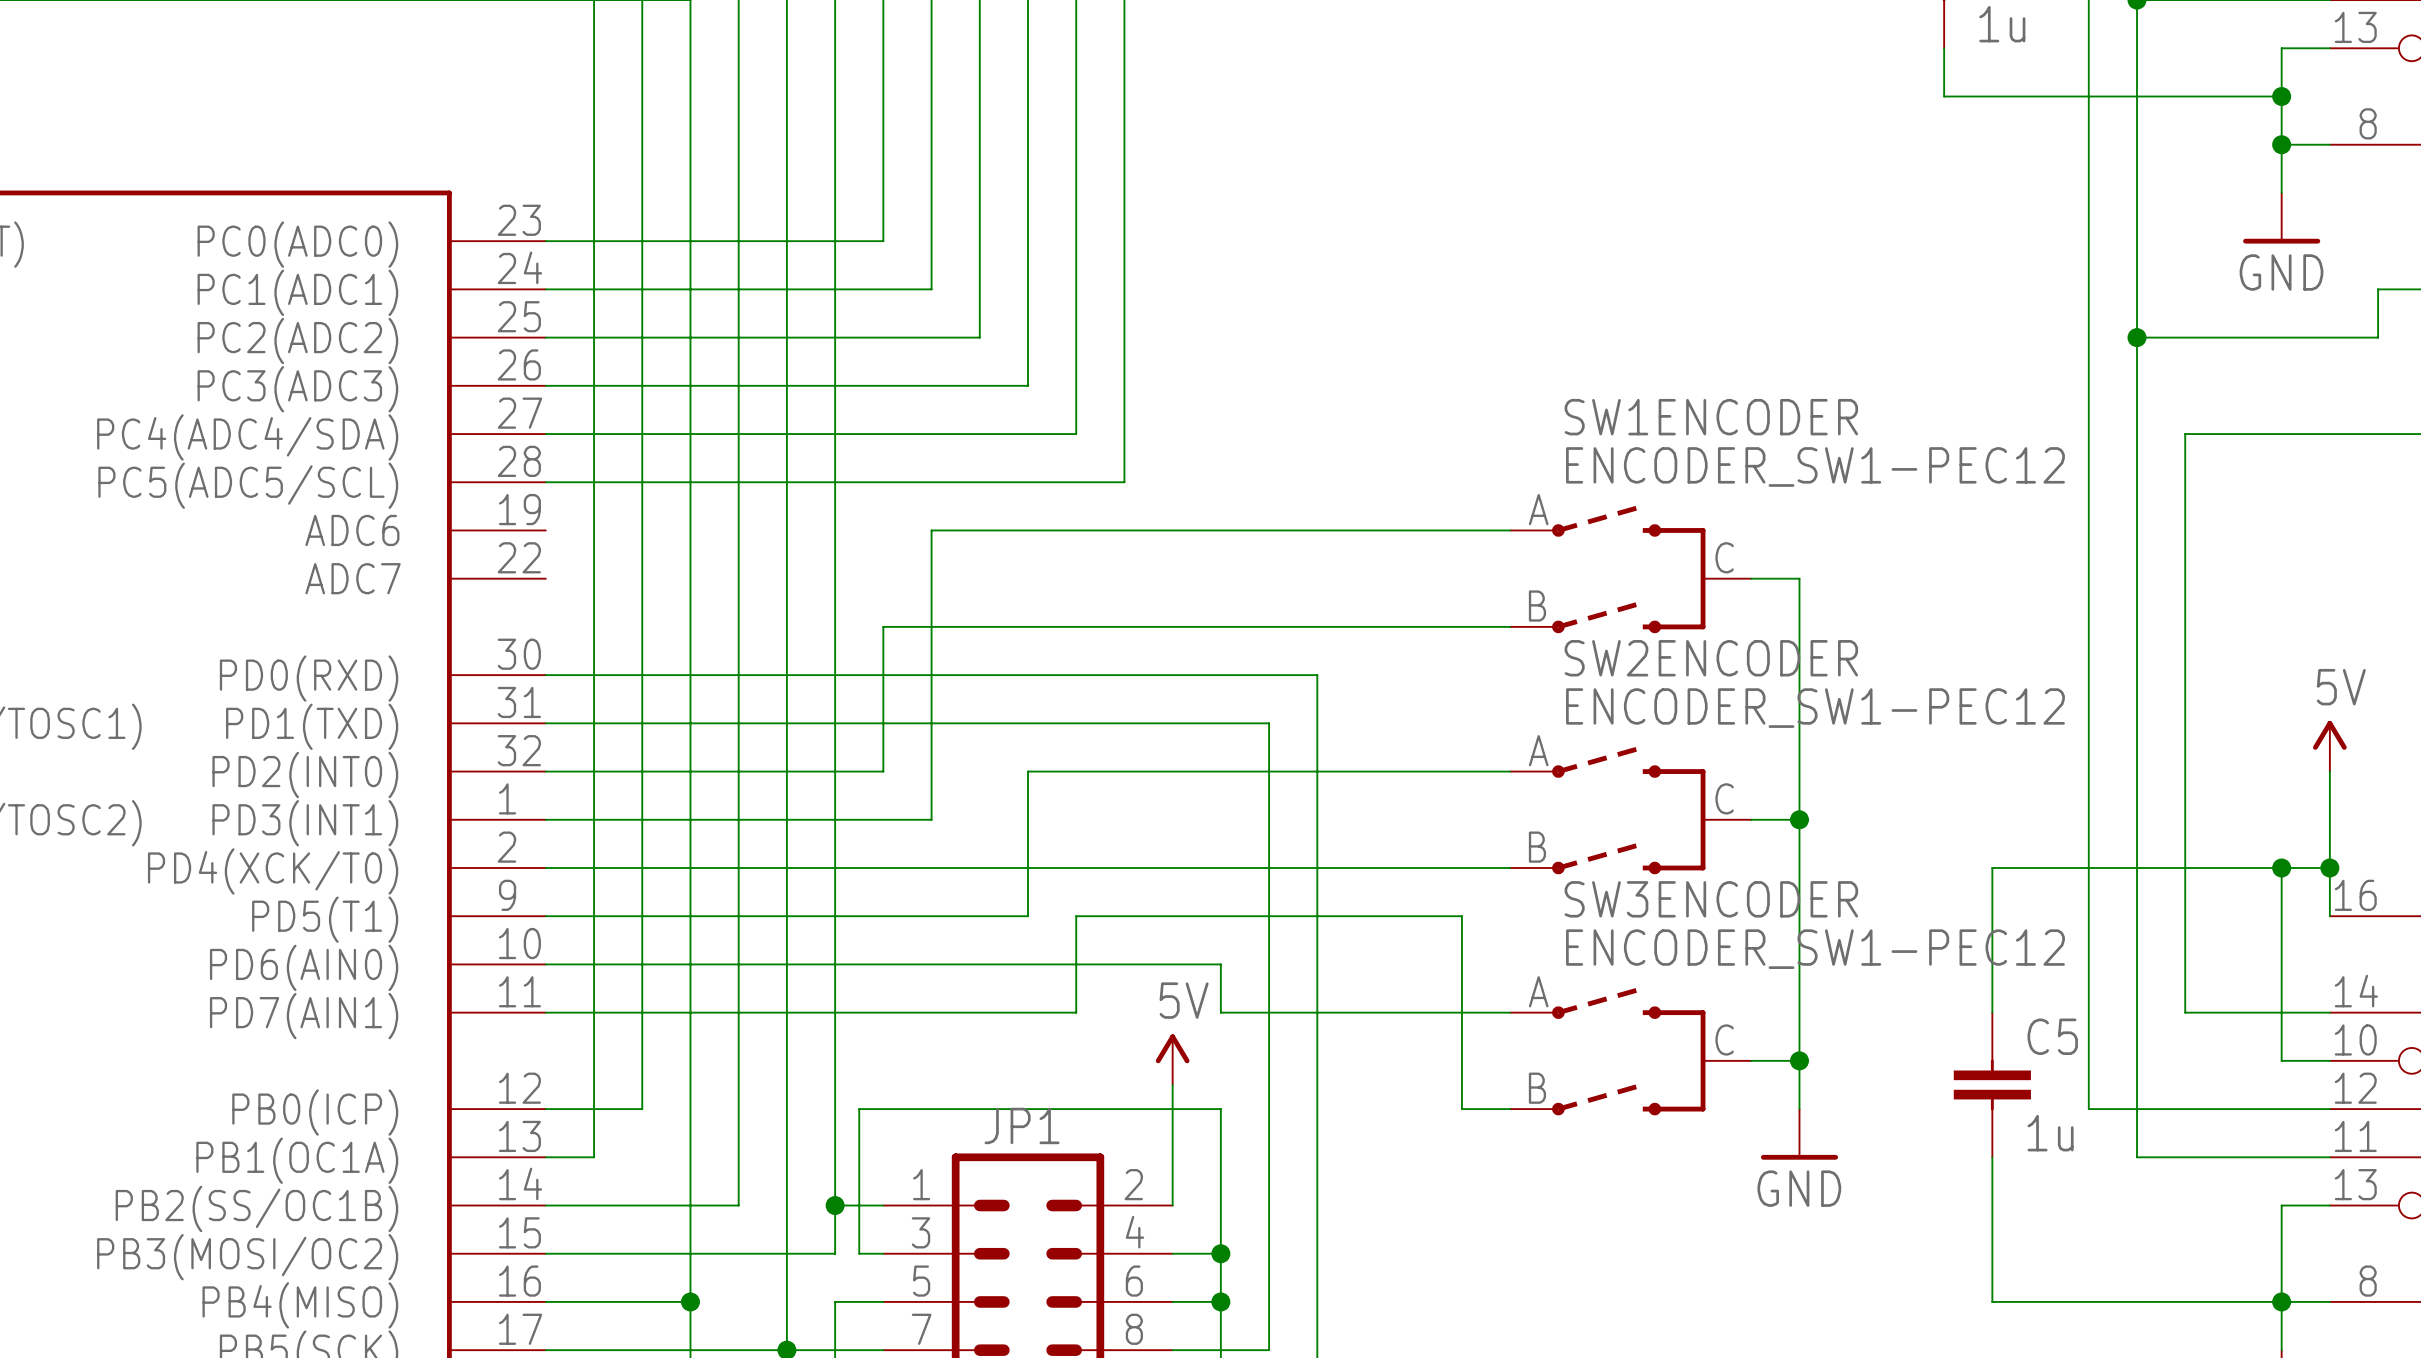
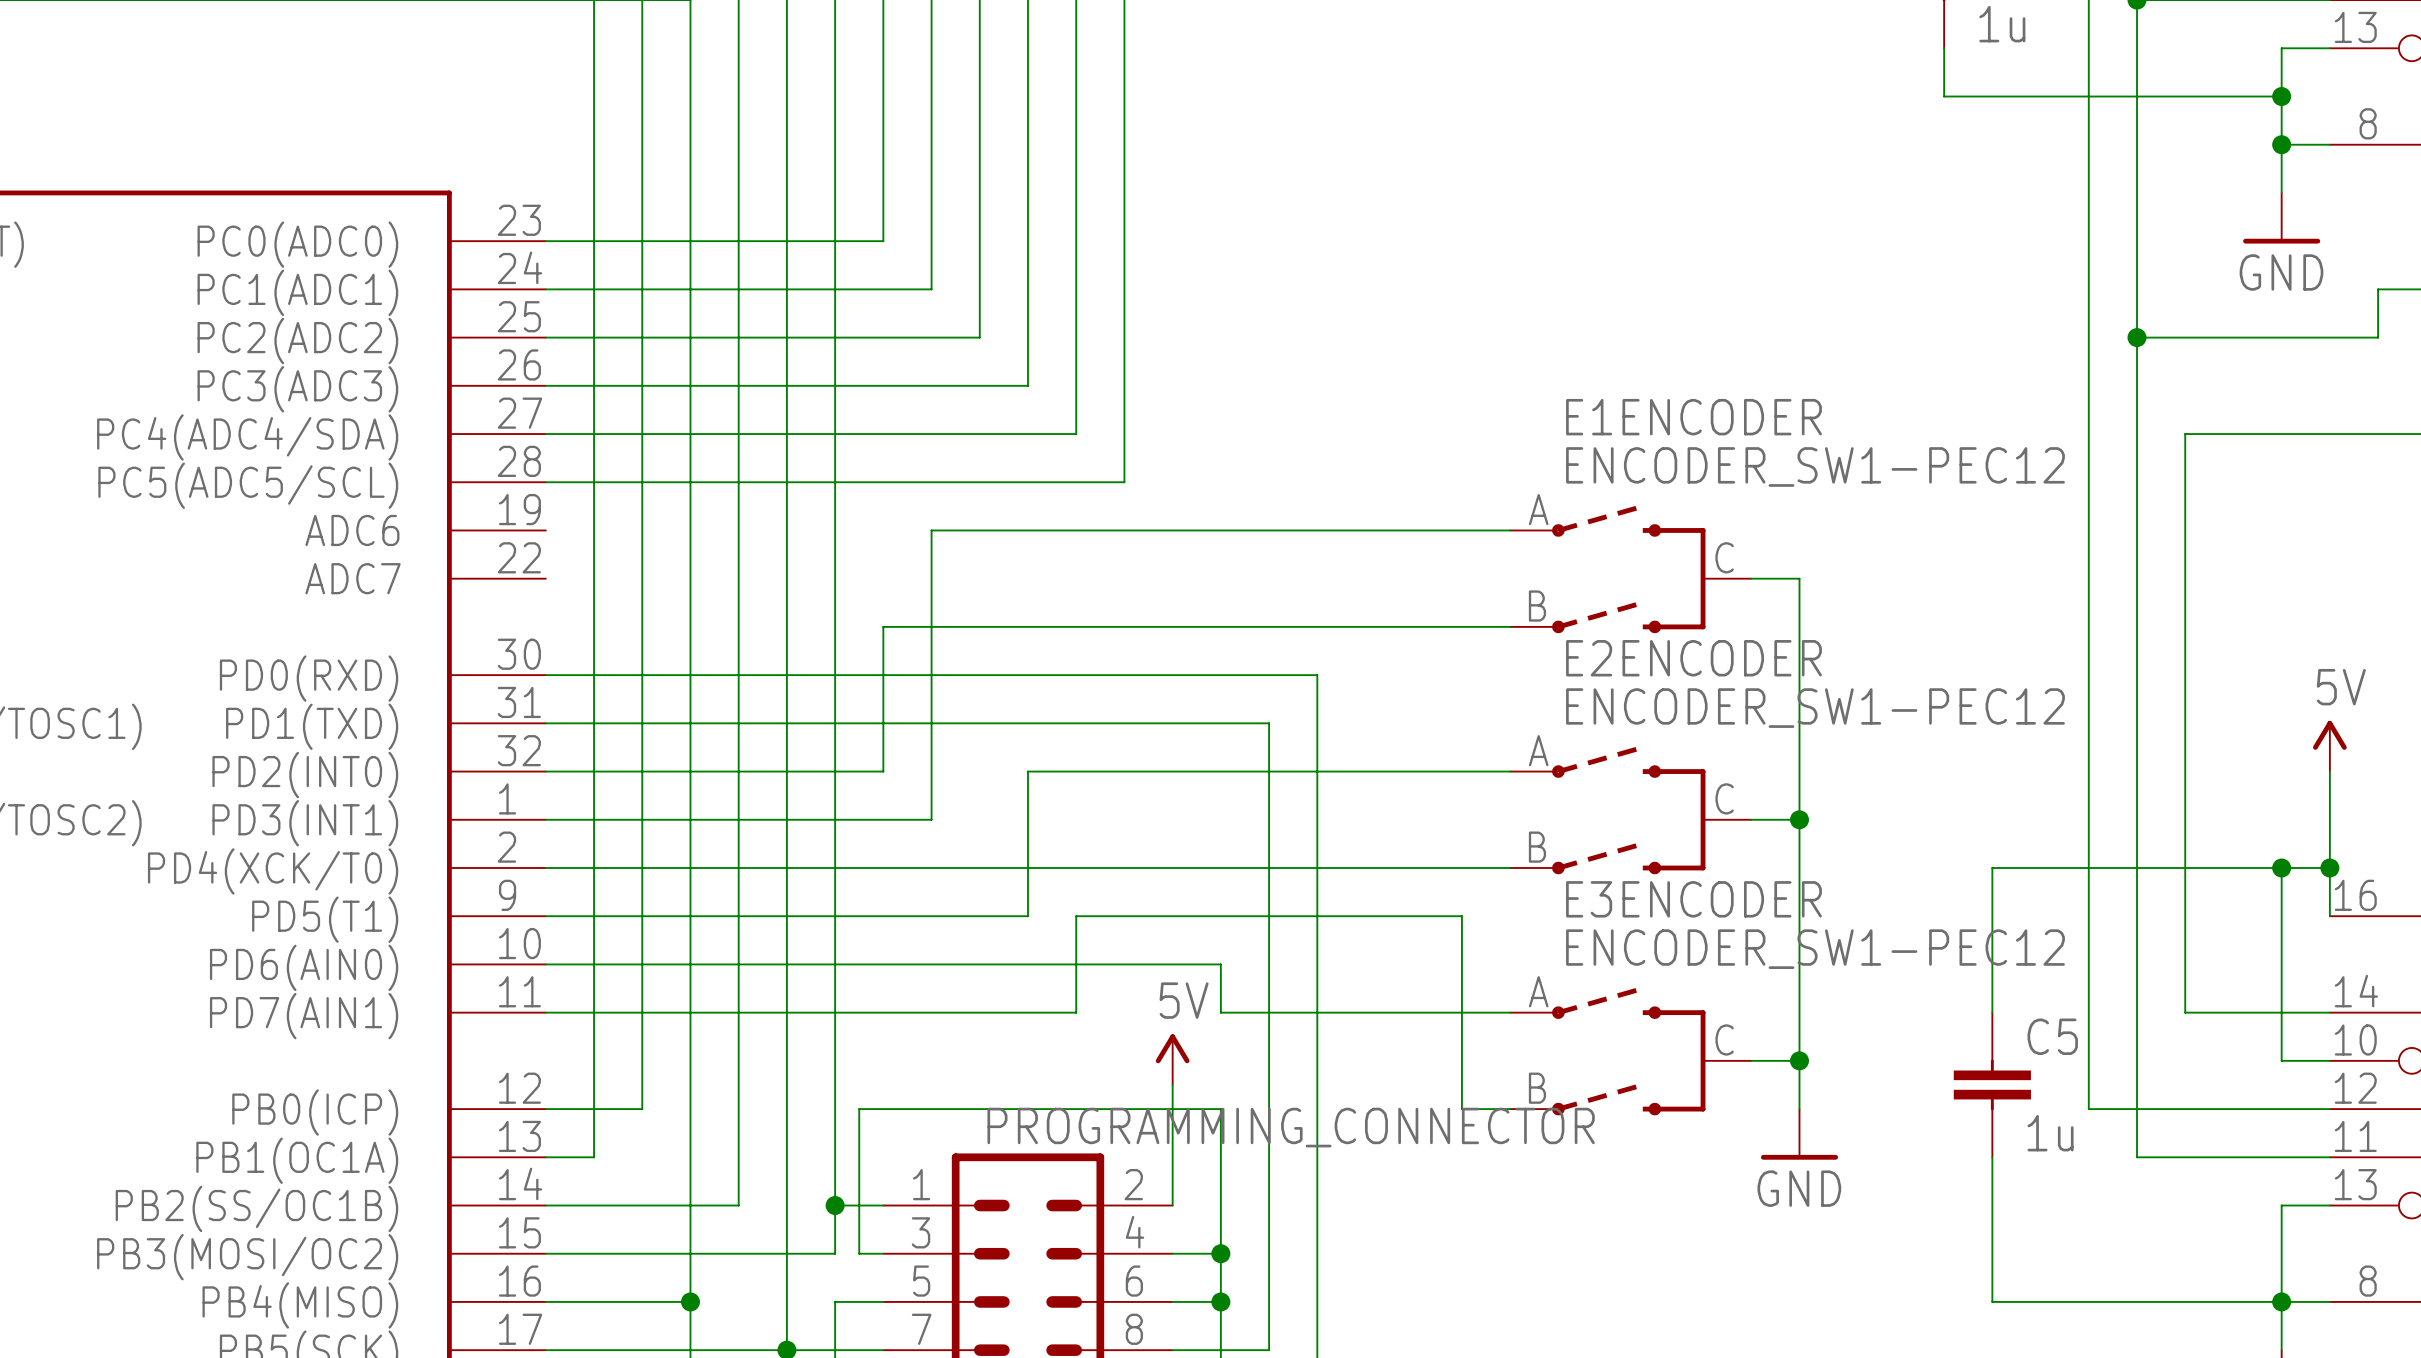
SW1ENCODER name: SW1ENCODER (1711, 417) -> E1ENCODER (1693, 417)
SW2ENCODER name: SW2ENCODER (1711, 658) -> E2ENCODER (1693, 658)
SW3ENCODER name: SW3ENCODER (1711, 899) -> E3ENCODER (1693, 899)
JP1 name: JP1 (1022, 1125) -> PROGRAMMING_CONNECTOR (1291, 1127)

